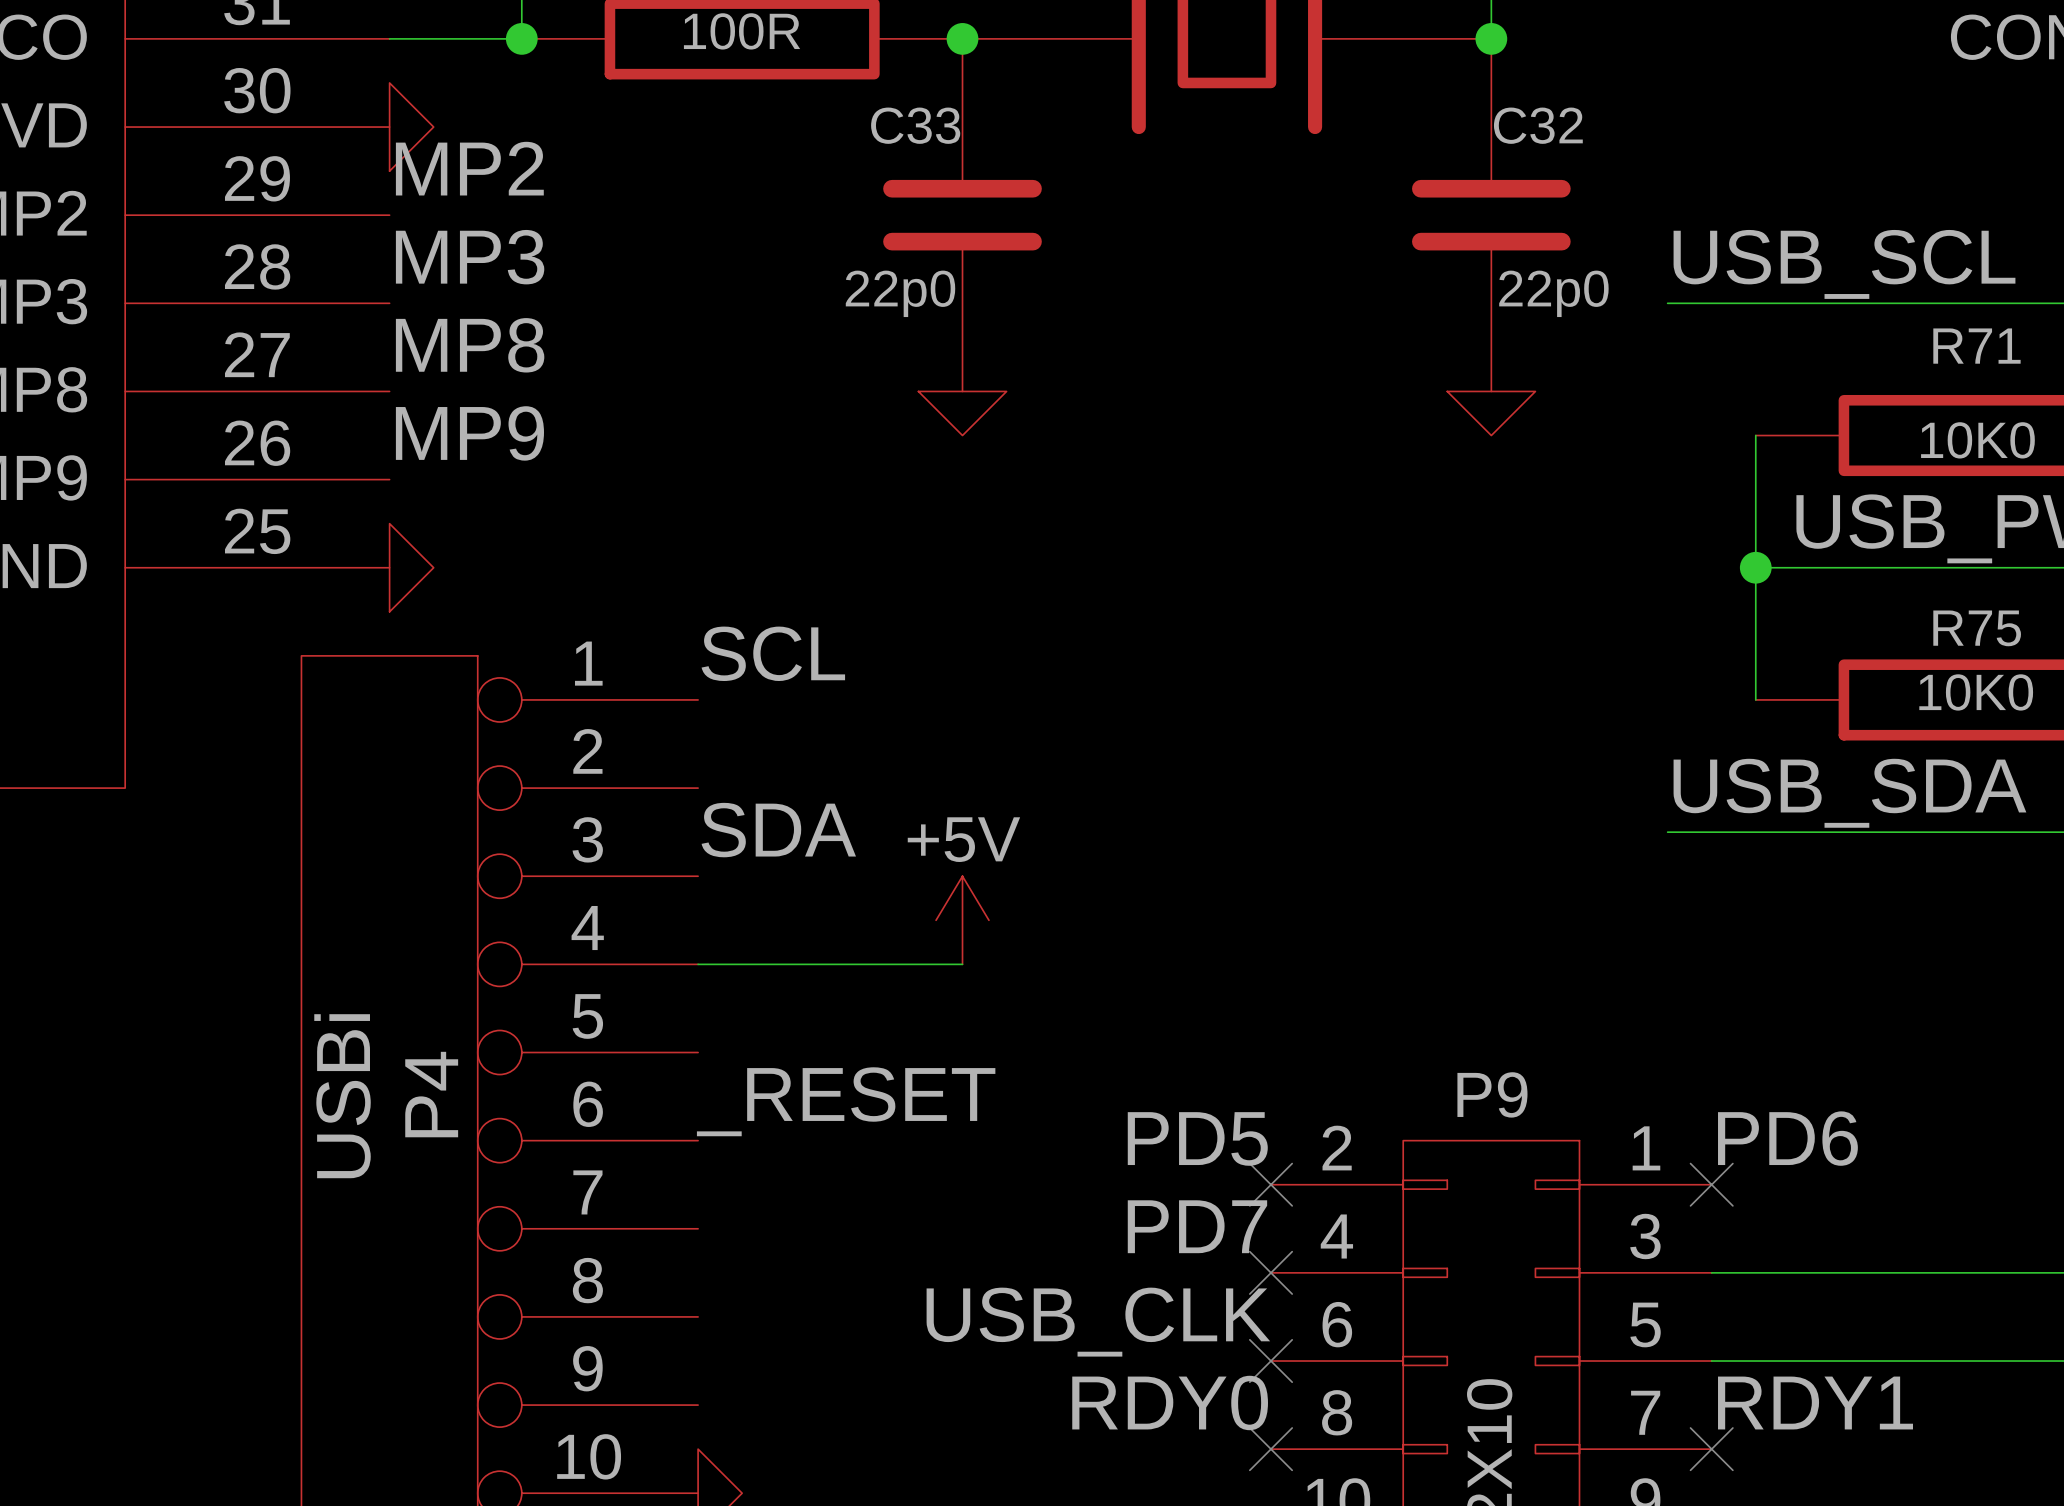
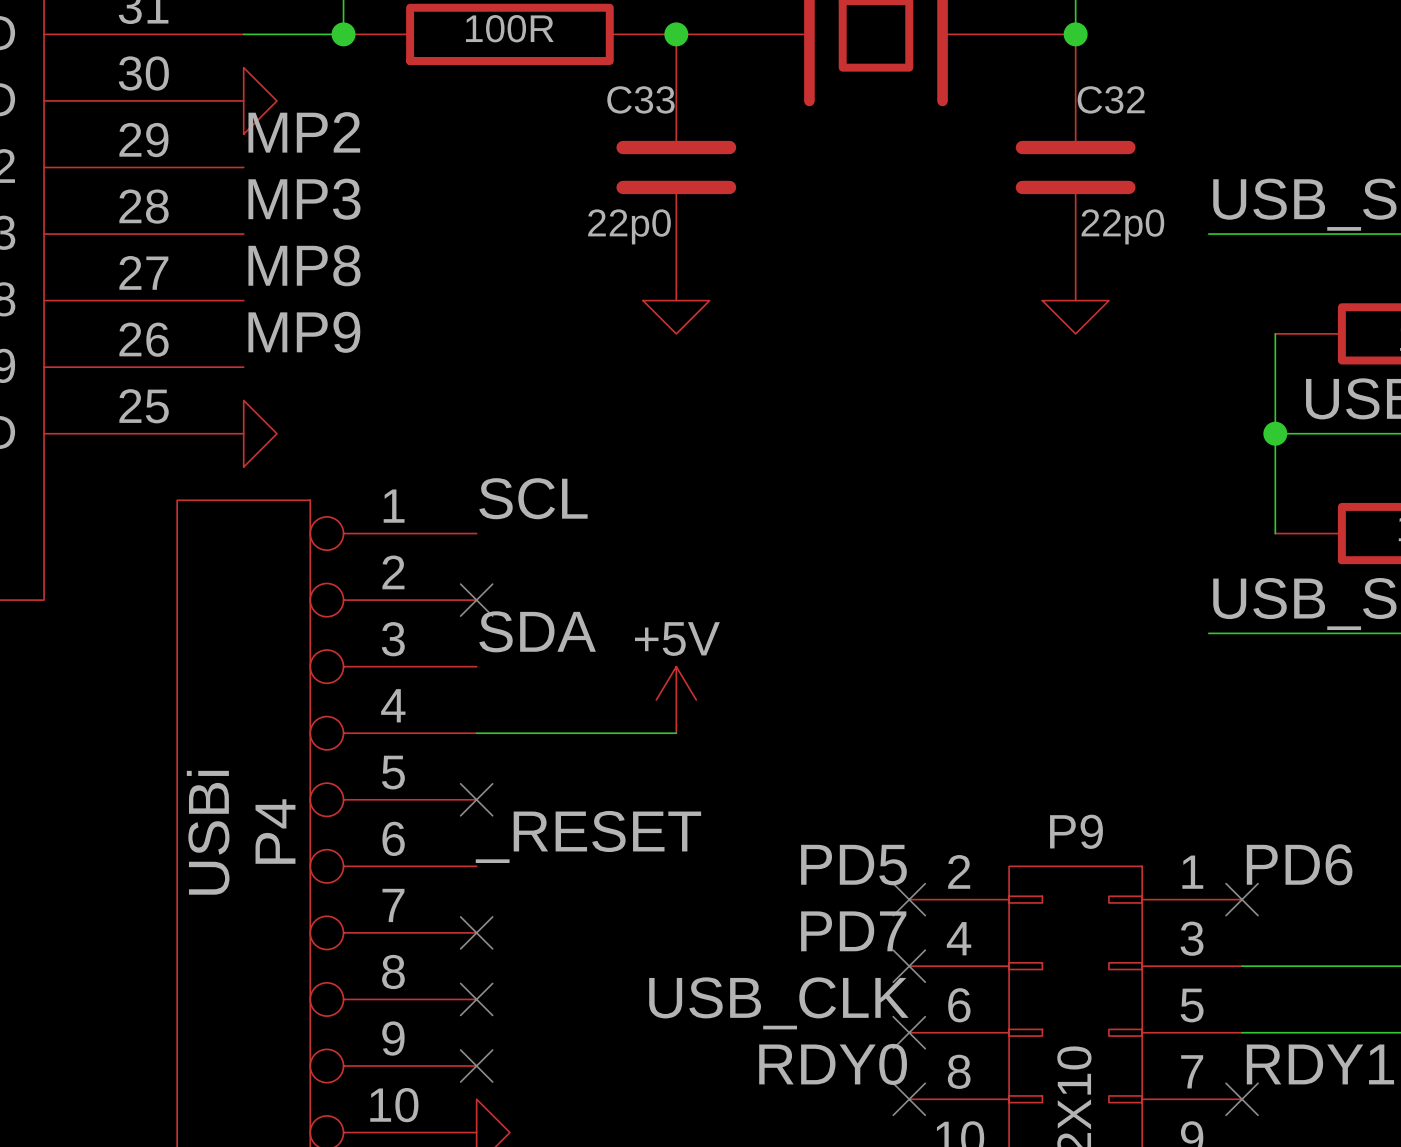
no-connect mark: none -> (476, 600)
no-connect mark: none -> (476, 799)
no-connect mark: none -> (476, 932)
no-connect mark: none -> (476, 999)
no-connect mark: none -> (476, 1066)

